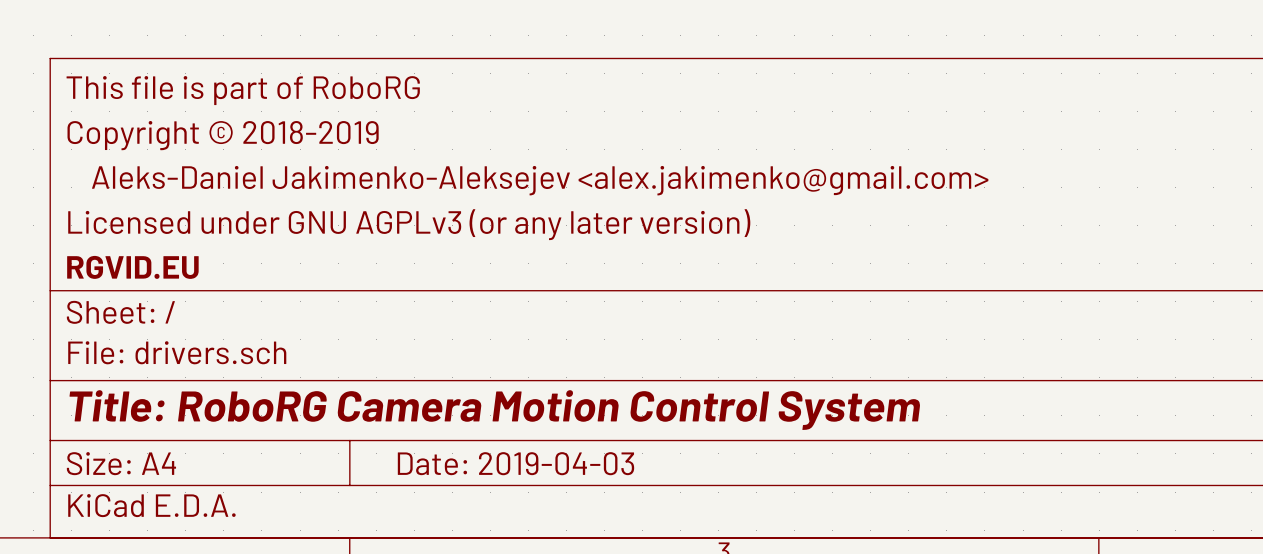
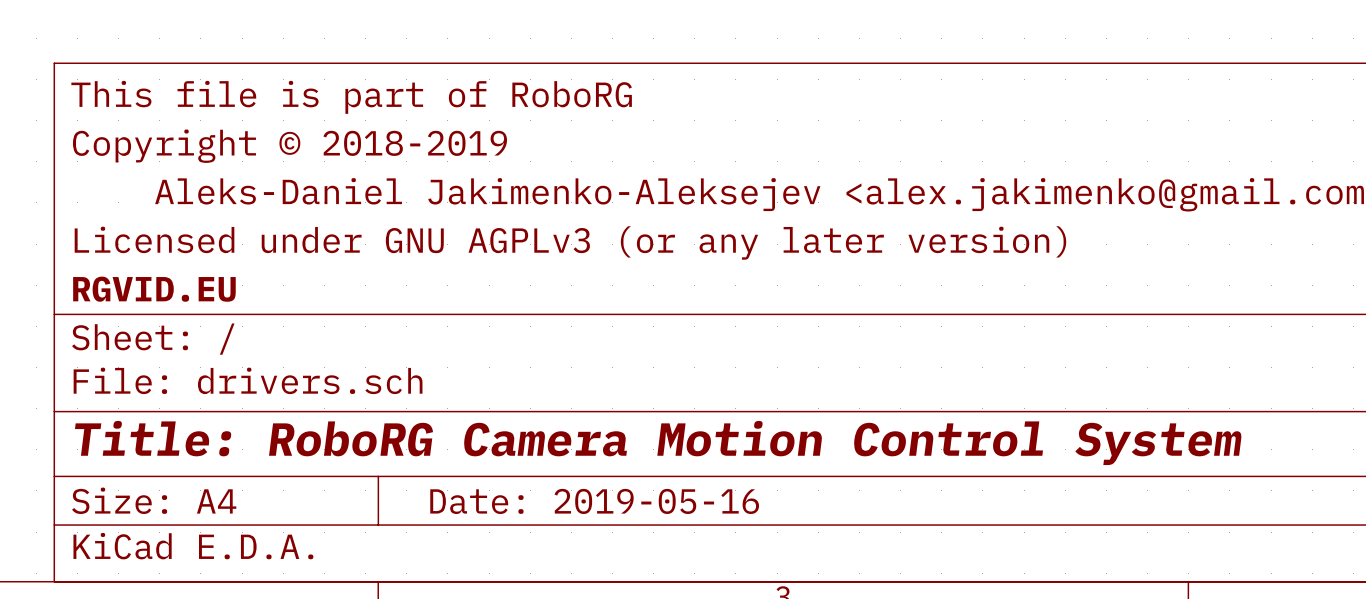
title block: Date: 2019-04-03 (515, 463) -> Date: 2019-05-16 (594, 501)

